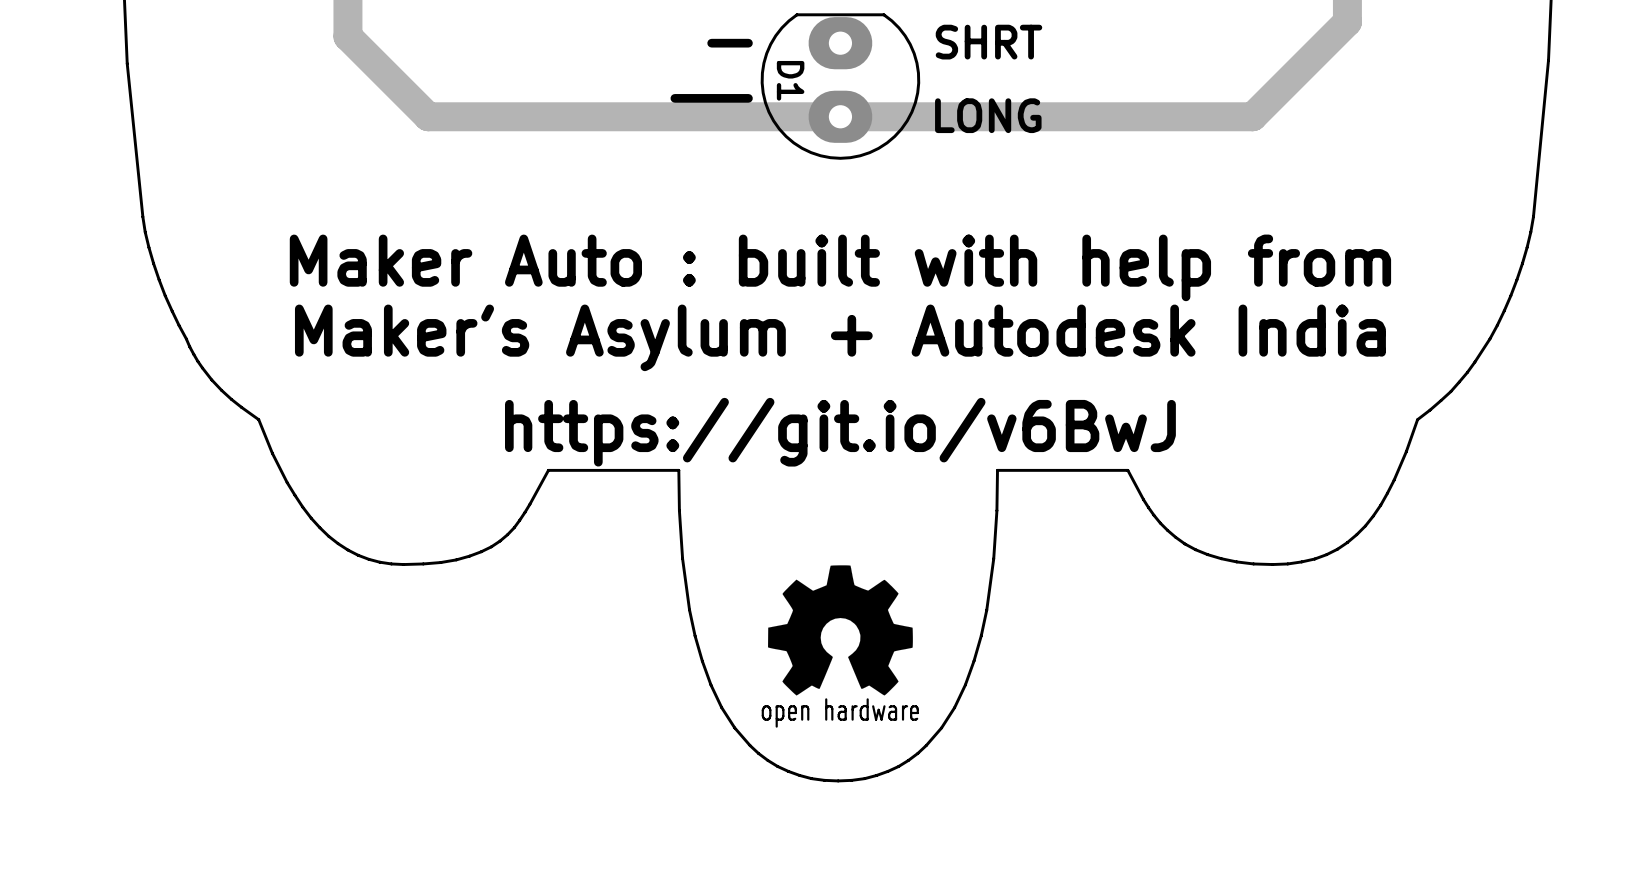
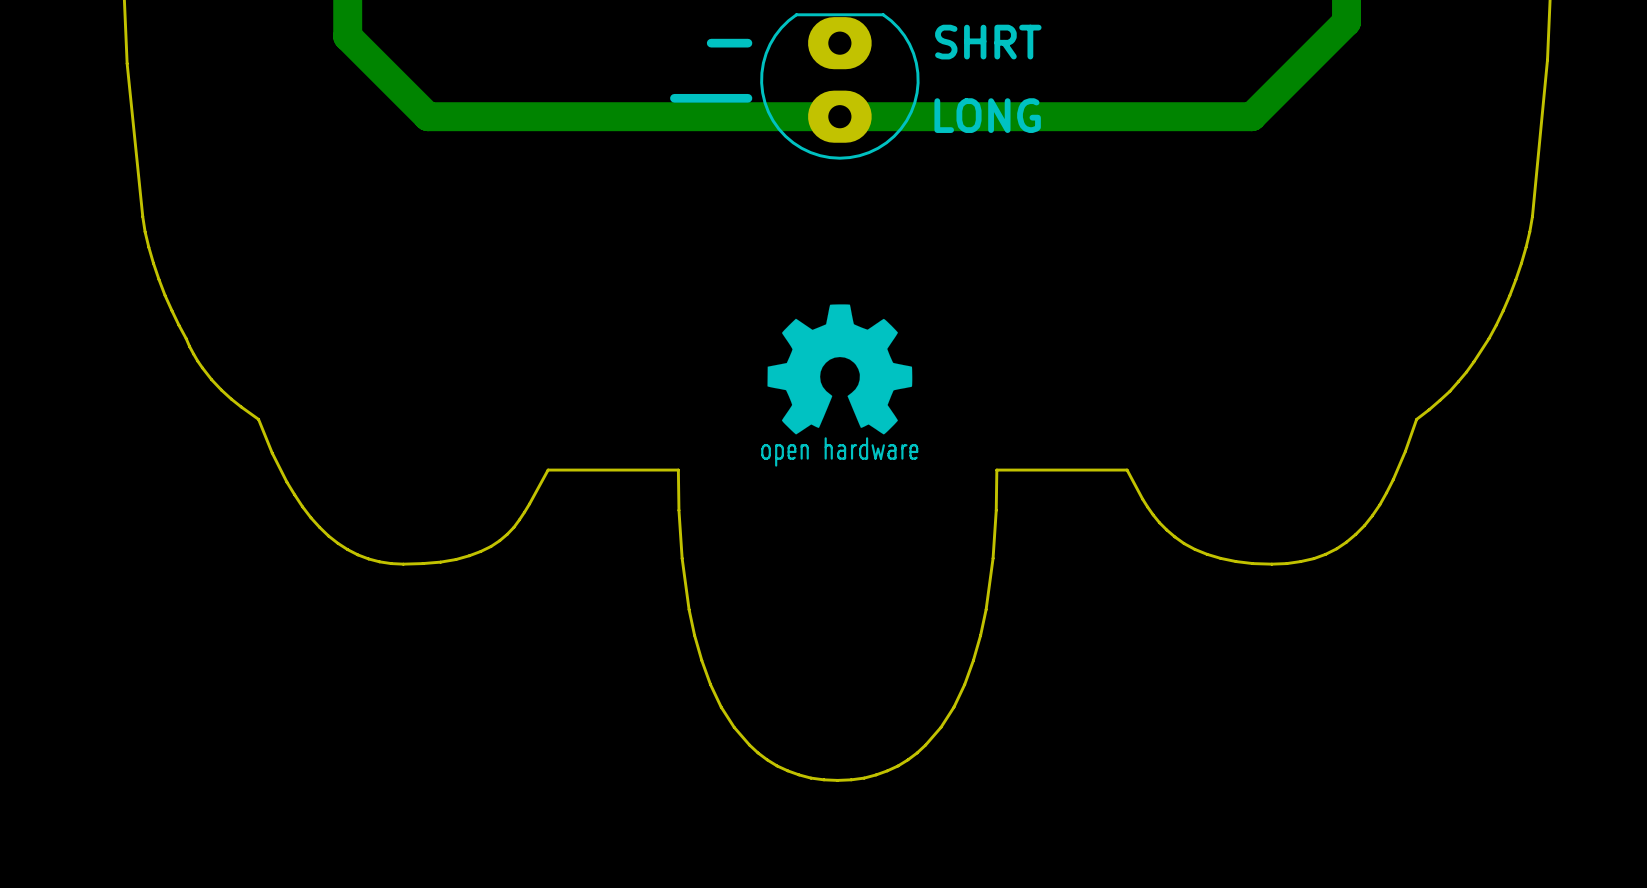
D1 name: D1 (790, 80) -> none
text: Maker Auto : built with help from (840, 267) -> none
text: Maker's Asylum + Autodesk India (840, 337) -> none
text: https://git.io/v6BwJ (840, 432) -> none
drawing position: (840, 646) -> (839, 385)

